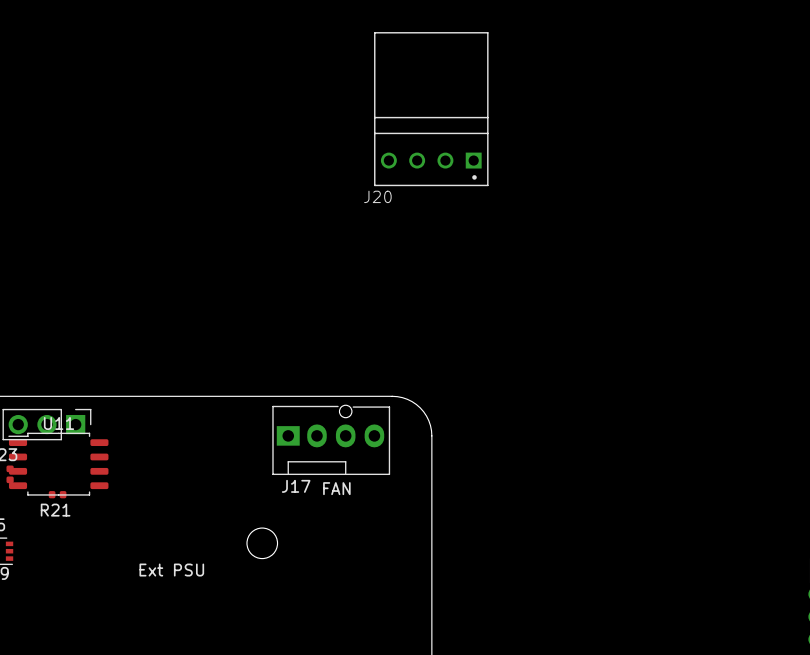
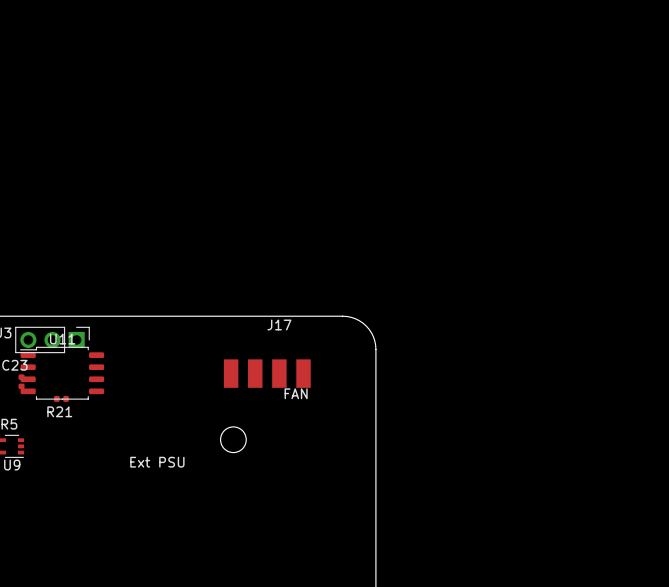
J20: (431, 109) -> none
J17 footprint: [272, 405, 391, 476] -> [223, 359, 311, 388]
J17 name position: J17 (296, 486) -> J17 (279, 324)

